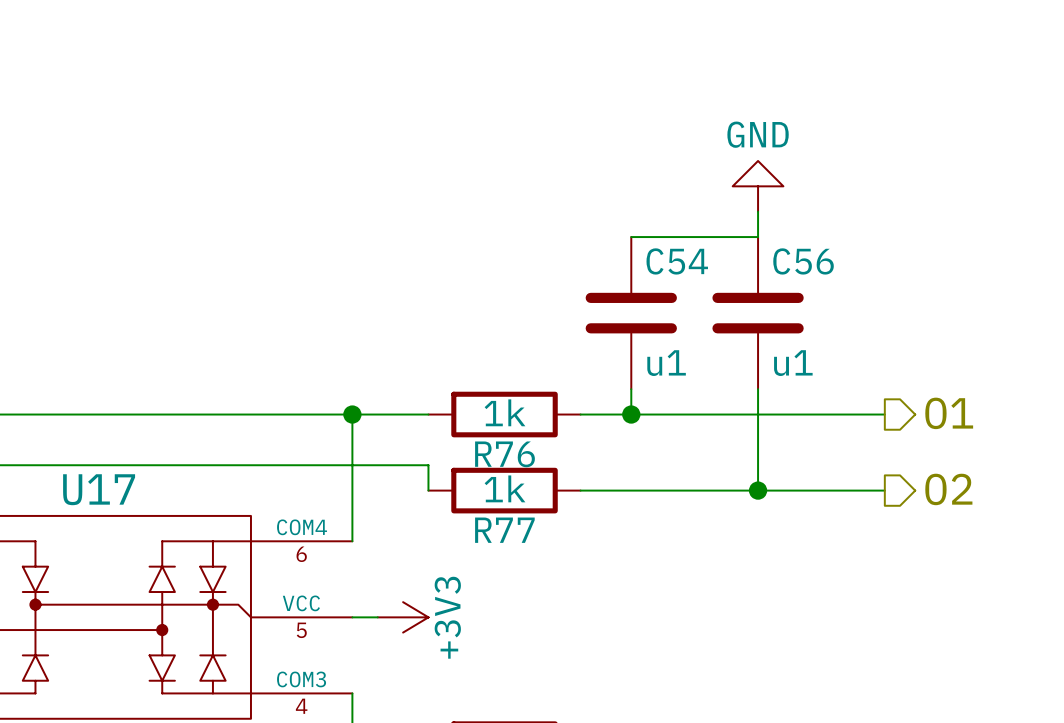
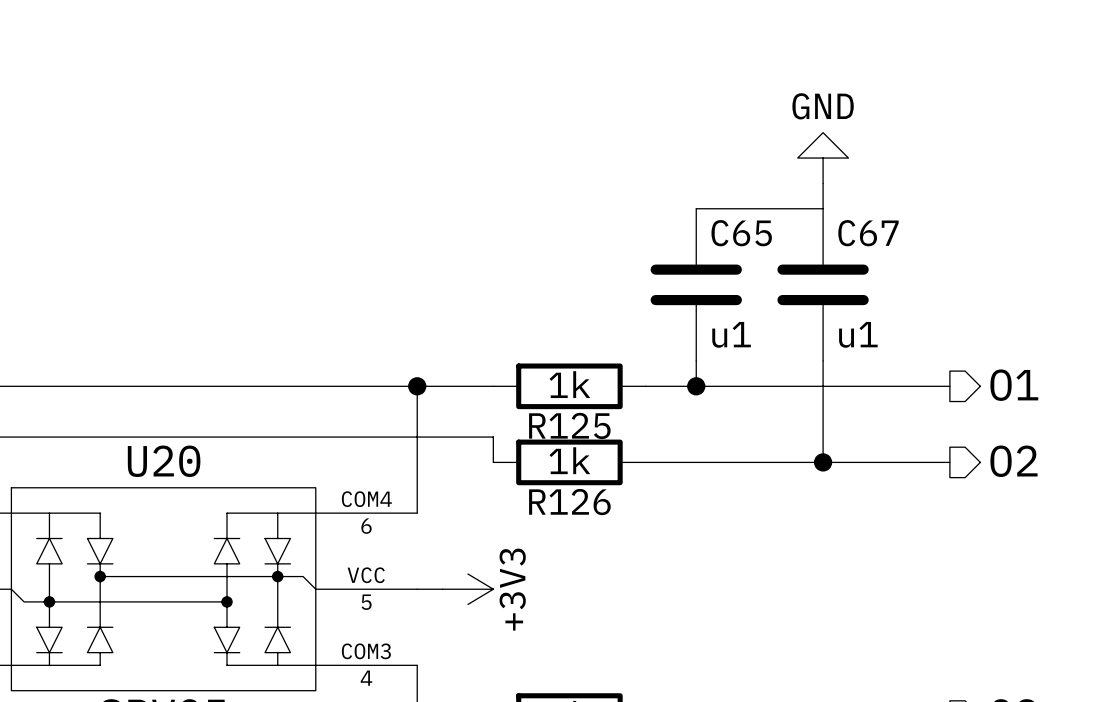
C54 name: C54 (677, 261) -> C65 (741, 233)
C56 name: C56 (803, 261) -> C67 (868, 233)
R76 name: R76 (504, 454) -> R125 (569, 425)
U17 name: U17 (99, 489) -> U20 (164, 461)
R77 name: R77 (504, 530) -> R126 (569, 502)

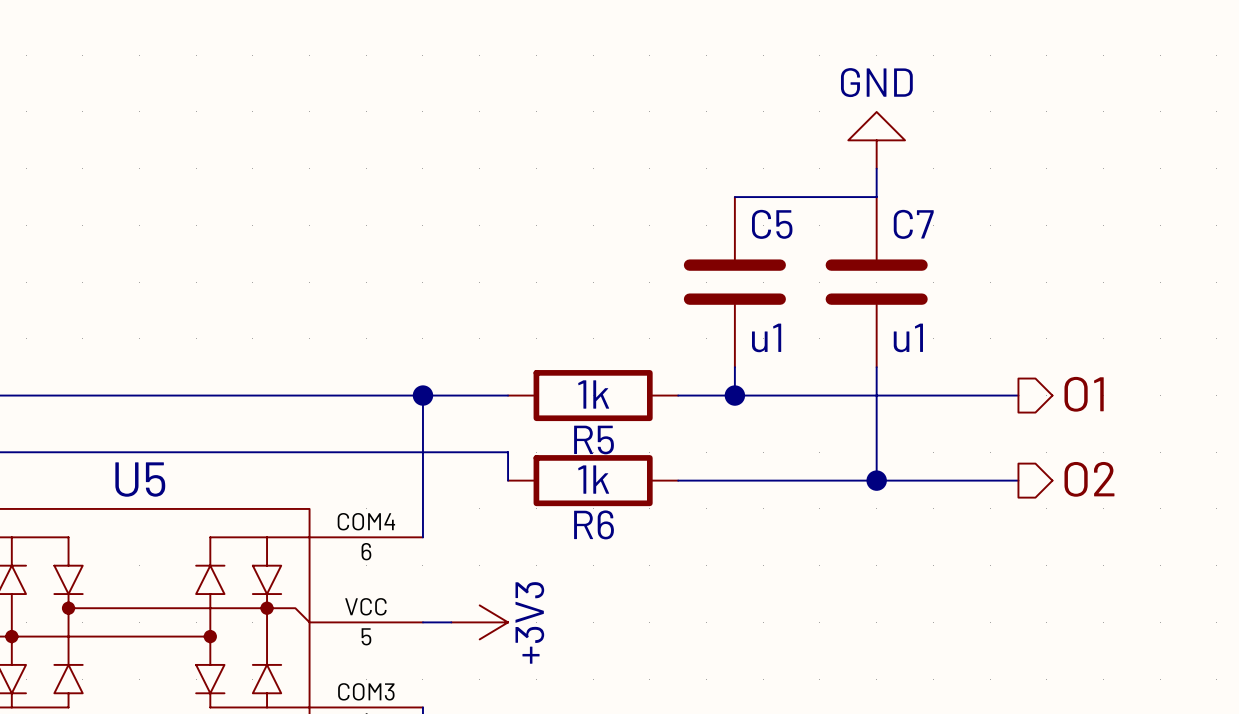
C65 name: C65 (741, 233) -> C5 (772, 224)
C67 name: C67 (868, 233) -> C7 (913, 224)
R125 name: R125 (569, 425) -> R5 (594, 440)
U20 name: U20 (164, 461) -> U5 (140, 479)
R126 name: R126 (569, 502) -> R6 (594, 524)

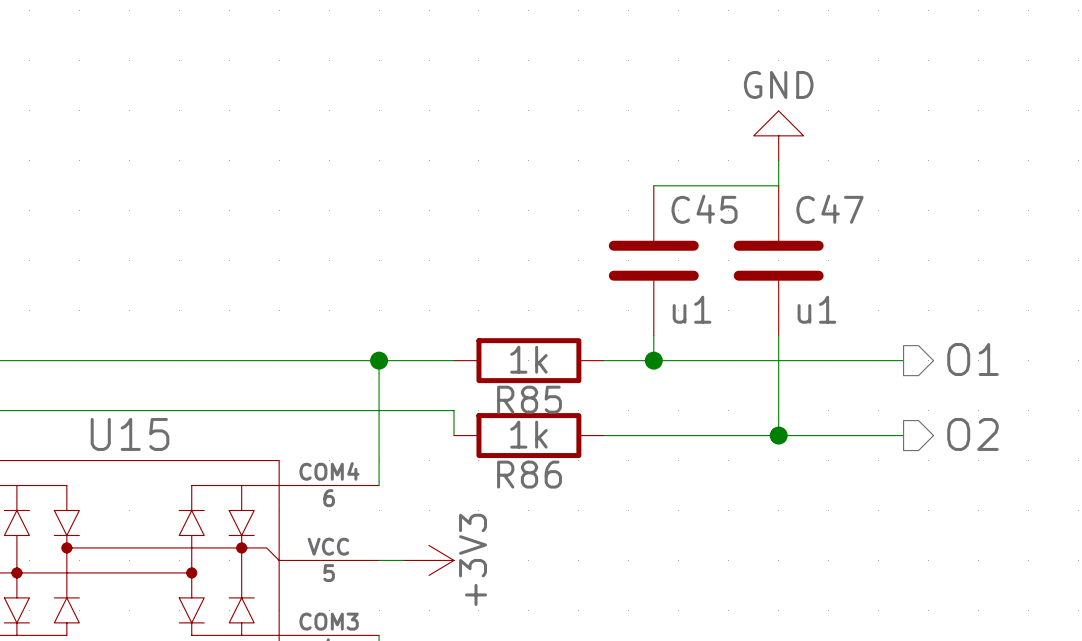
C5 name: C5 (772, 224) -> C45 (704, 209)
C7 name: C7 (913, 224) -> C47 (830, 209)
R5 name: R5 (594, 440) -> R85 (529, 399)
U5 name: U5 (140, 479) -> U15 (130, 434)
R6 name: R6 (594, 524) -> R86 (529, 474)

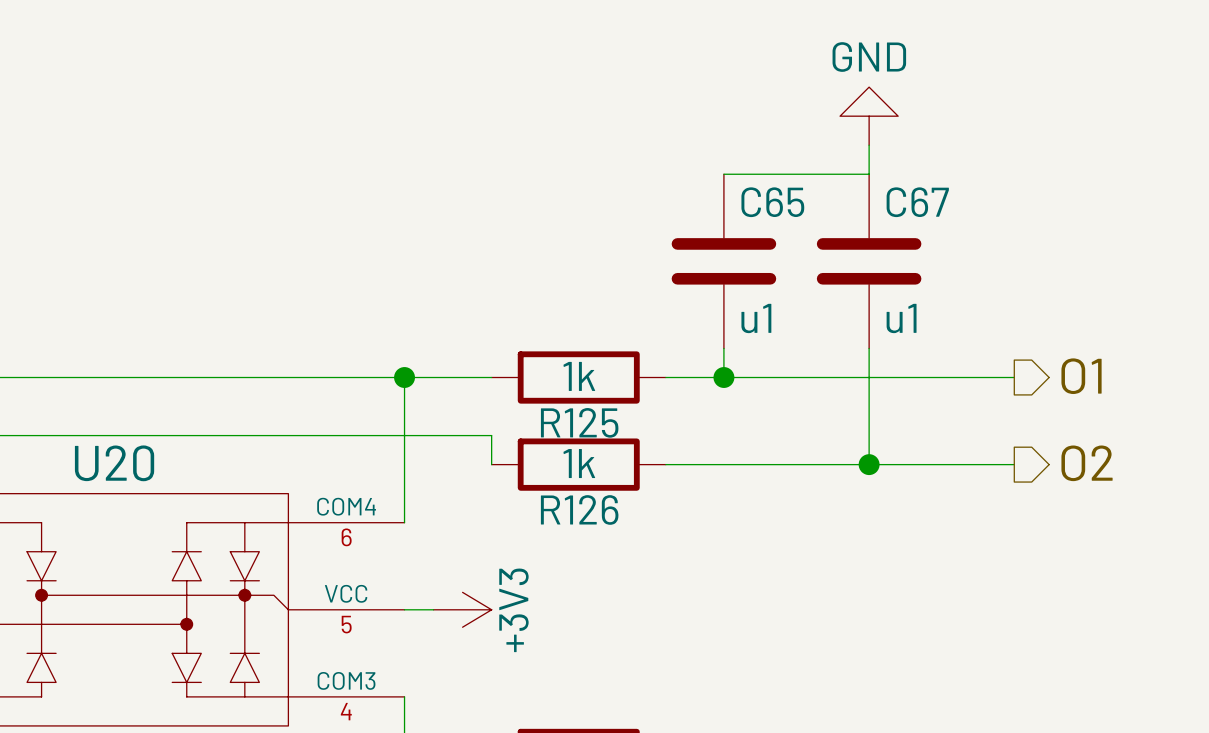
C45 name: C45 (704, 209) -> C65 (772, 202)
C47 name: C47 (830, 209) -> C67 (917, 202)
R85 name: R85 (529, 399) -> R125 (579, 422)
U15 name: U15 (130, 434) -> U20 (114, 463)
R86 name: R86 (529, 474) -> R126 (579, 509)

